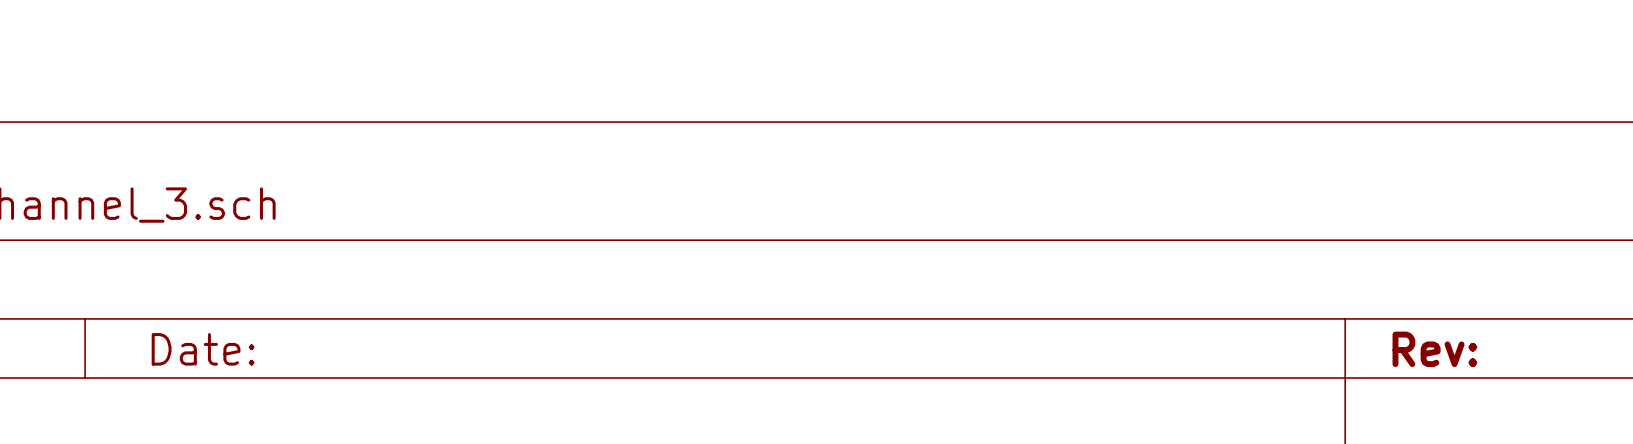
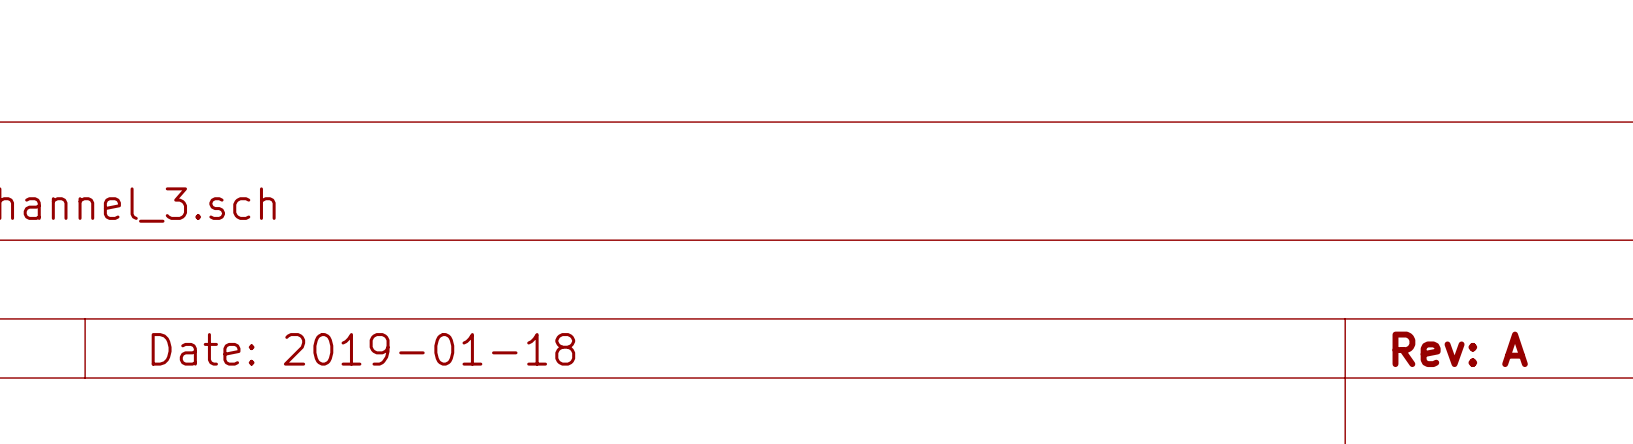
title block: Date: (203, 349) -> Date: 2019-01-18 (363, 349)
title block: Rev: (1434, 349) -> Rev: A (1460, 349)

